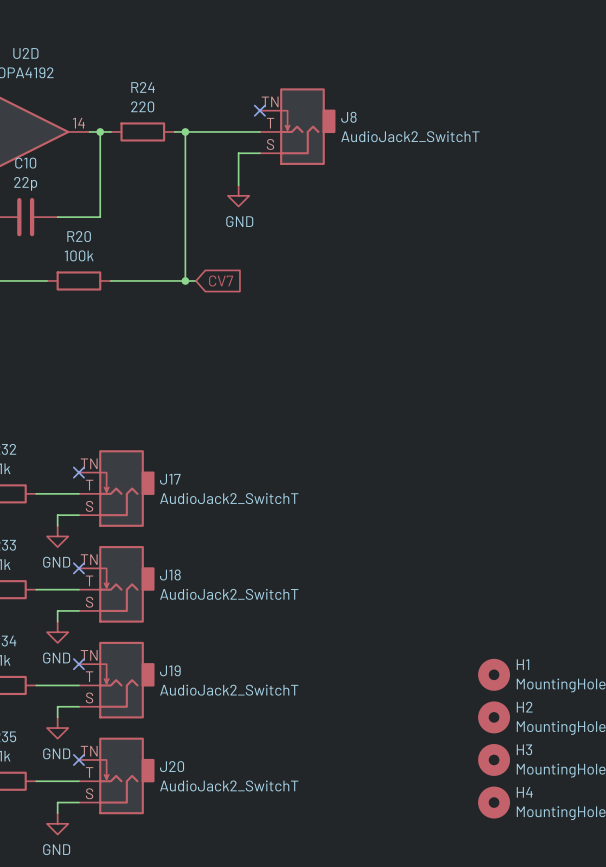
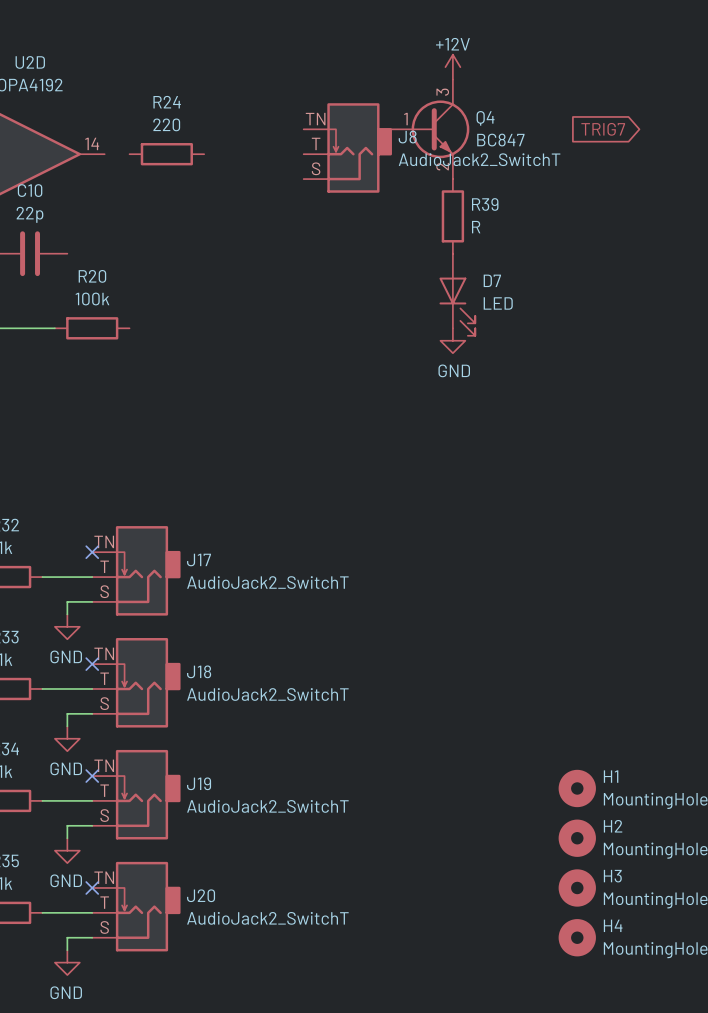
power symbol: none -> +12V (452, 67)
no-connect mark: (259, 110) -> none
Q4: none -> BC847 (423, 129)
global label: none -> TRIG7 (603, 129)
wire: (89, 131) (110, 131) -> none
wire: (100, 131) (100, 217) (57, 217) -> none
junction: (100, 131) -> none
wire: (174, 131) (259, 131) -> none
wire: (185, 131) (185, 280) -> none
junction: (185, 131) -> none
wire: (259, 153) (238, 153) (238, 185) -> none
R39: none -> R (452, 216)
power symbol position: GND (238, 195) -> GND (452, 340)
D7: none -> LED (457, 294)
wire: (110, 280) (196, 280) -> none
junction: (185, 280) -> none
global label: CV7 (221, 280) -> none

